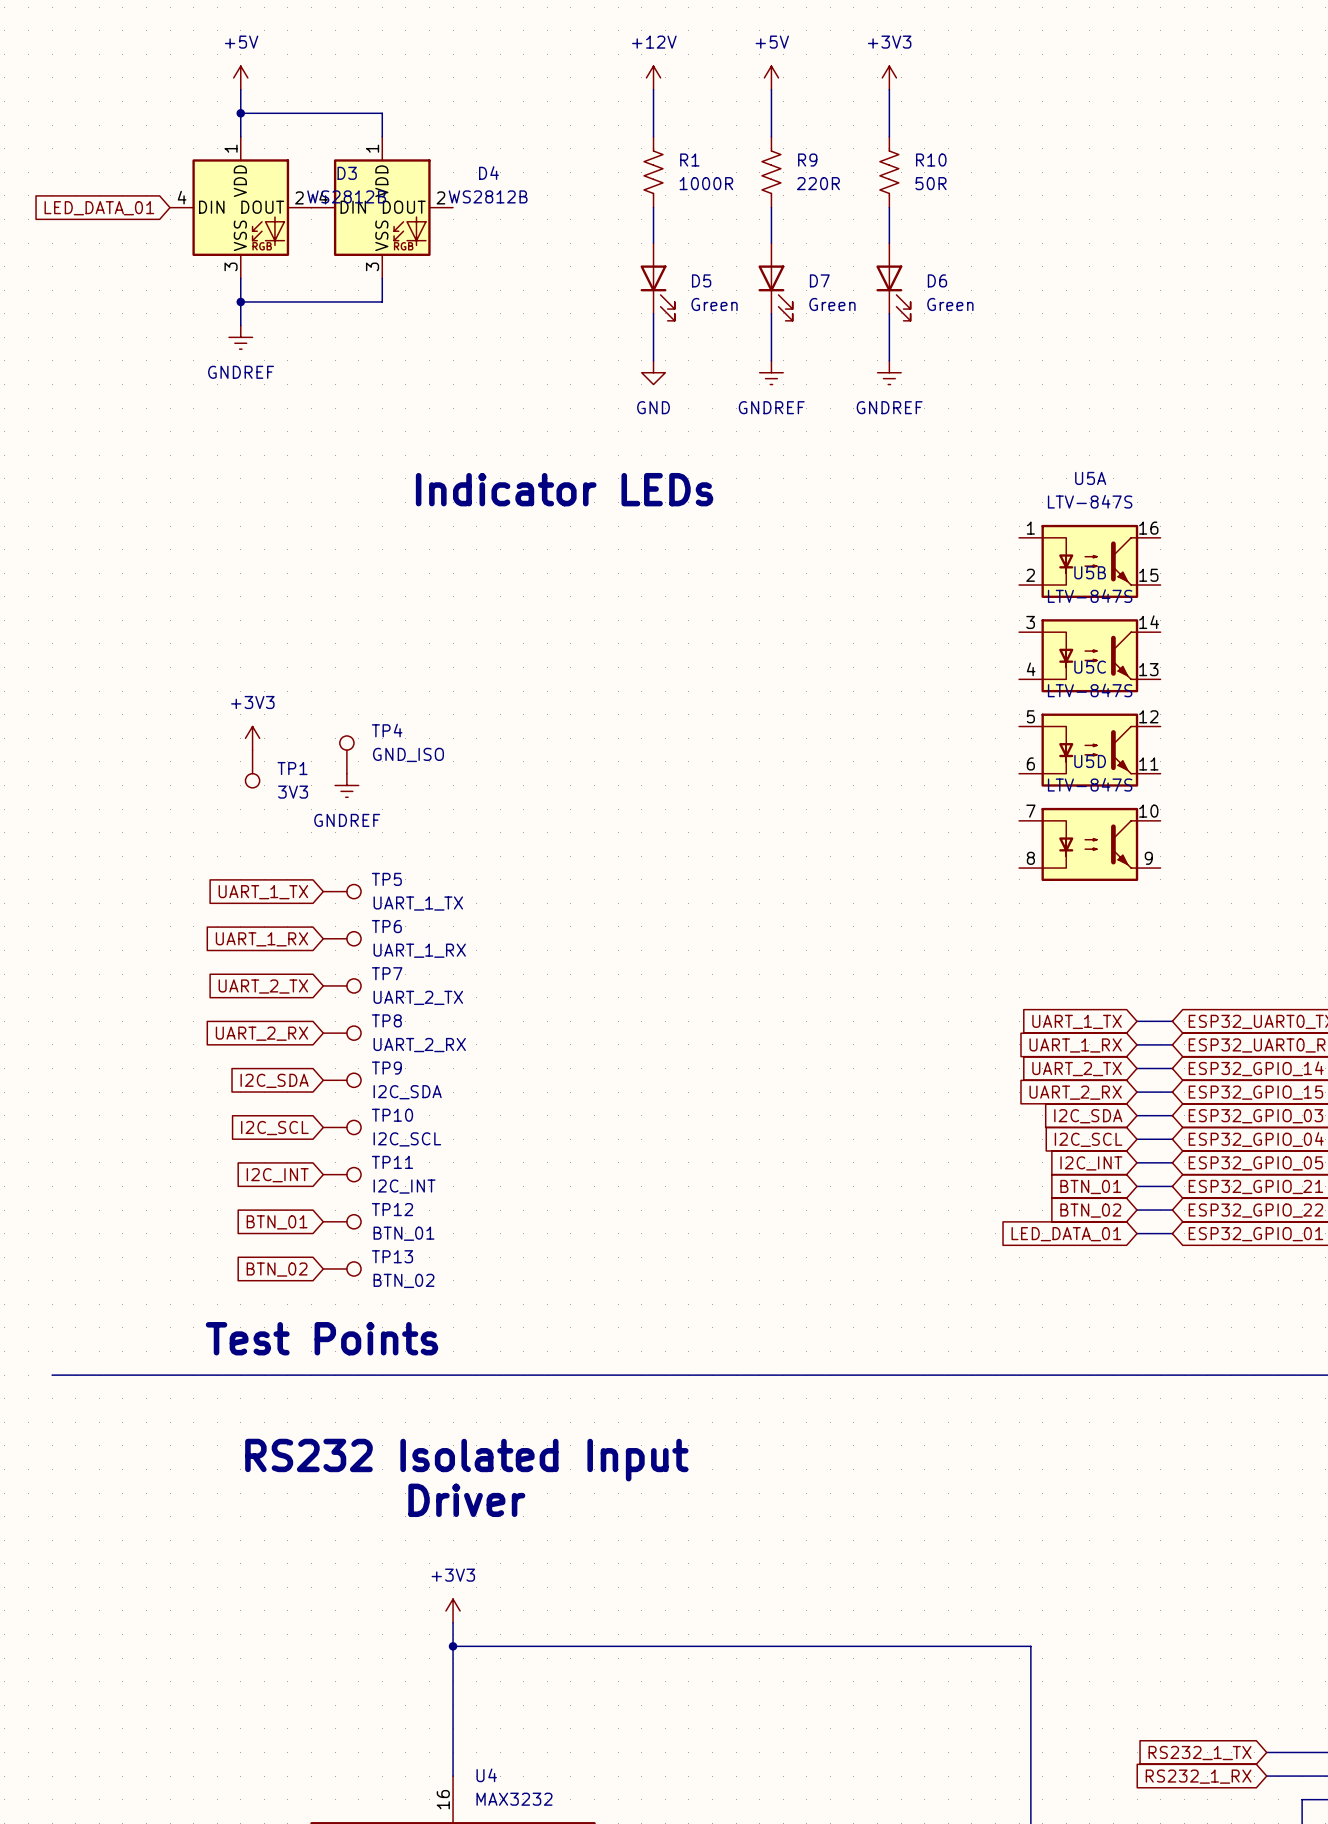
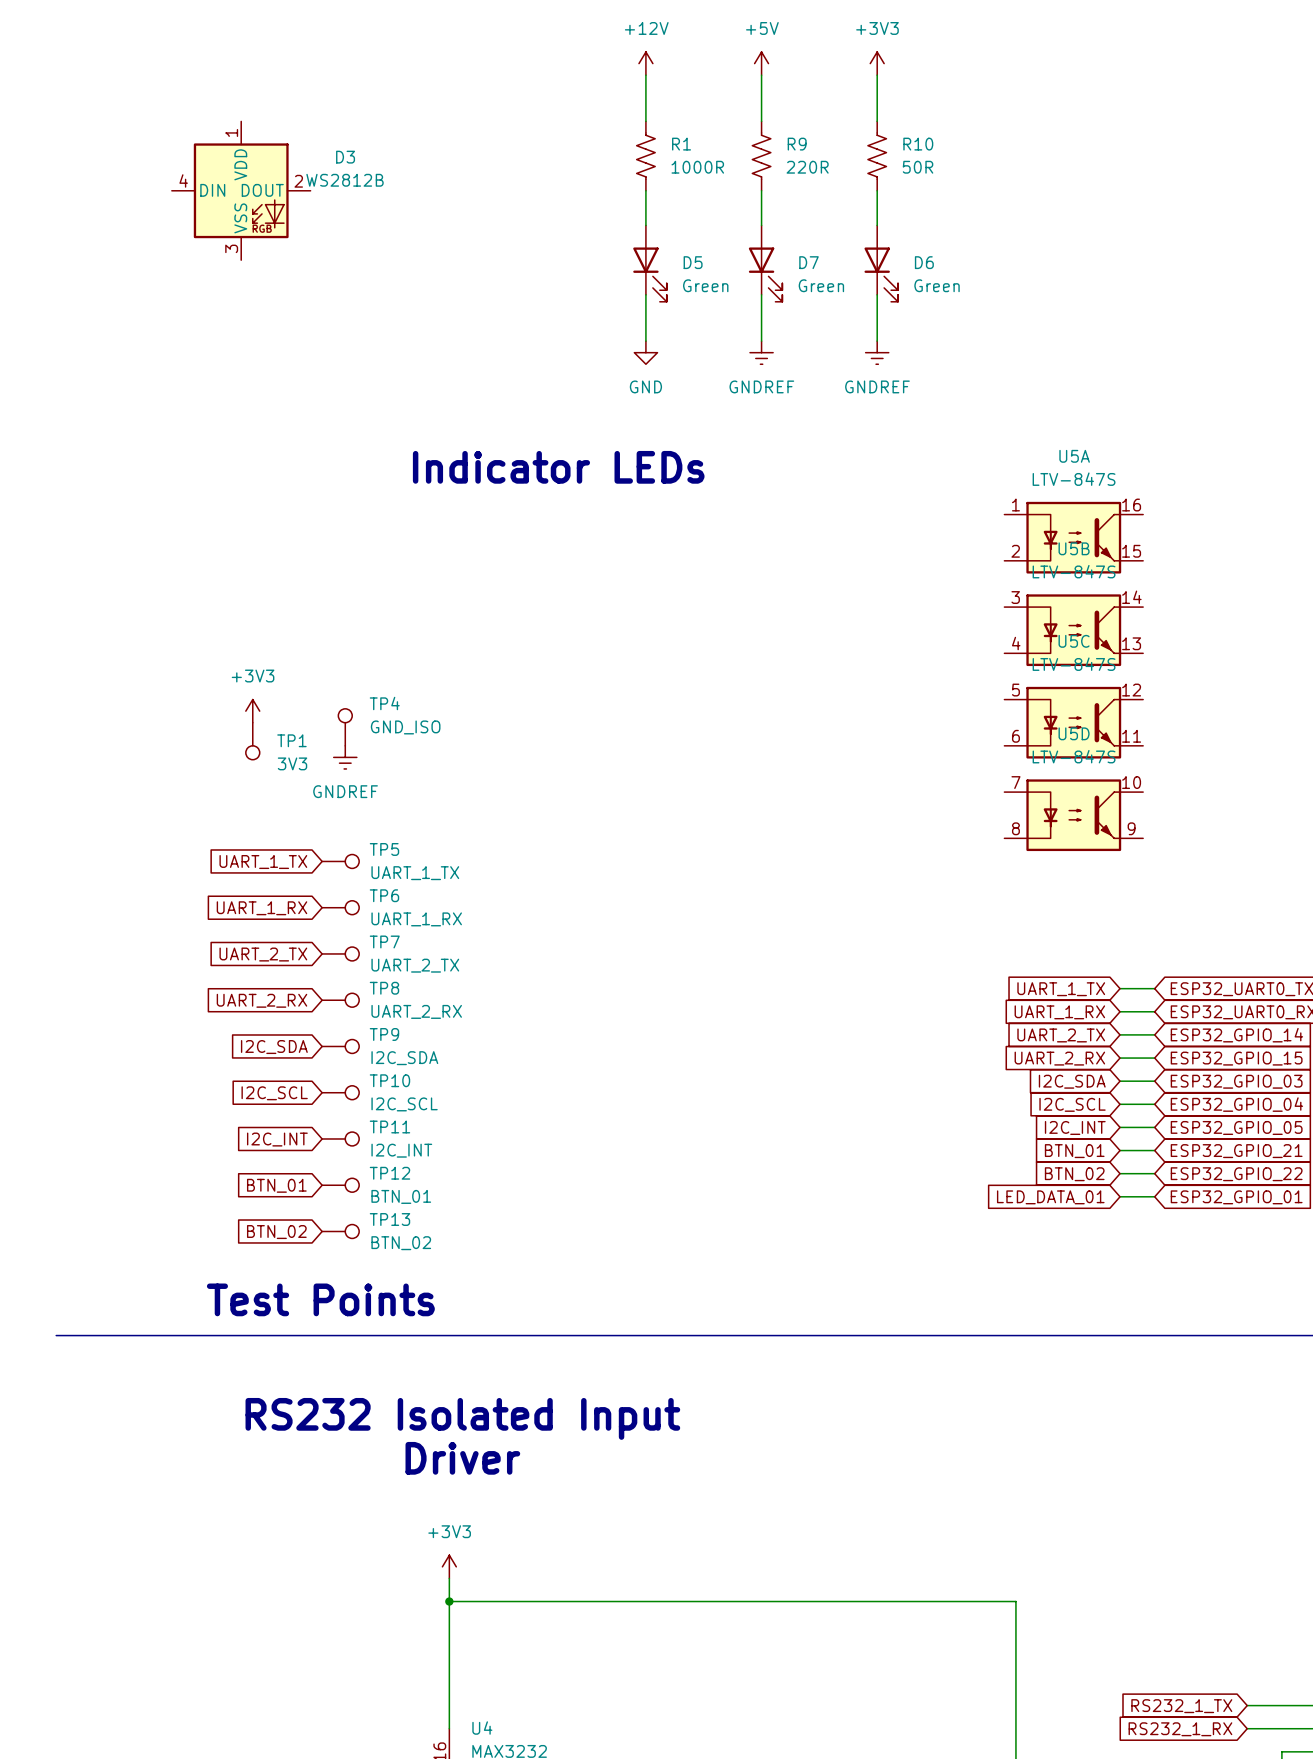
power symbol: +5V (240, 77) -> none
wire: (240, 89) (240, 136) -> none
wire: (240, 113) (382, 113) (382, 136) -> none
junction: (240, 113) -> none
D4: WS2812B (382, 207) -> none
global label: LED_DATA_01 (99, 208) -> none
wire: (240, 278) (240, 325) -> none
wire: (382, 278) (382, 301) (240, 301) -> none
junction: (240, 301) -> none
power symbol: GNDREF (240, 337) -> none

